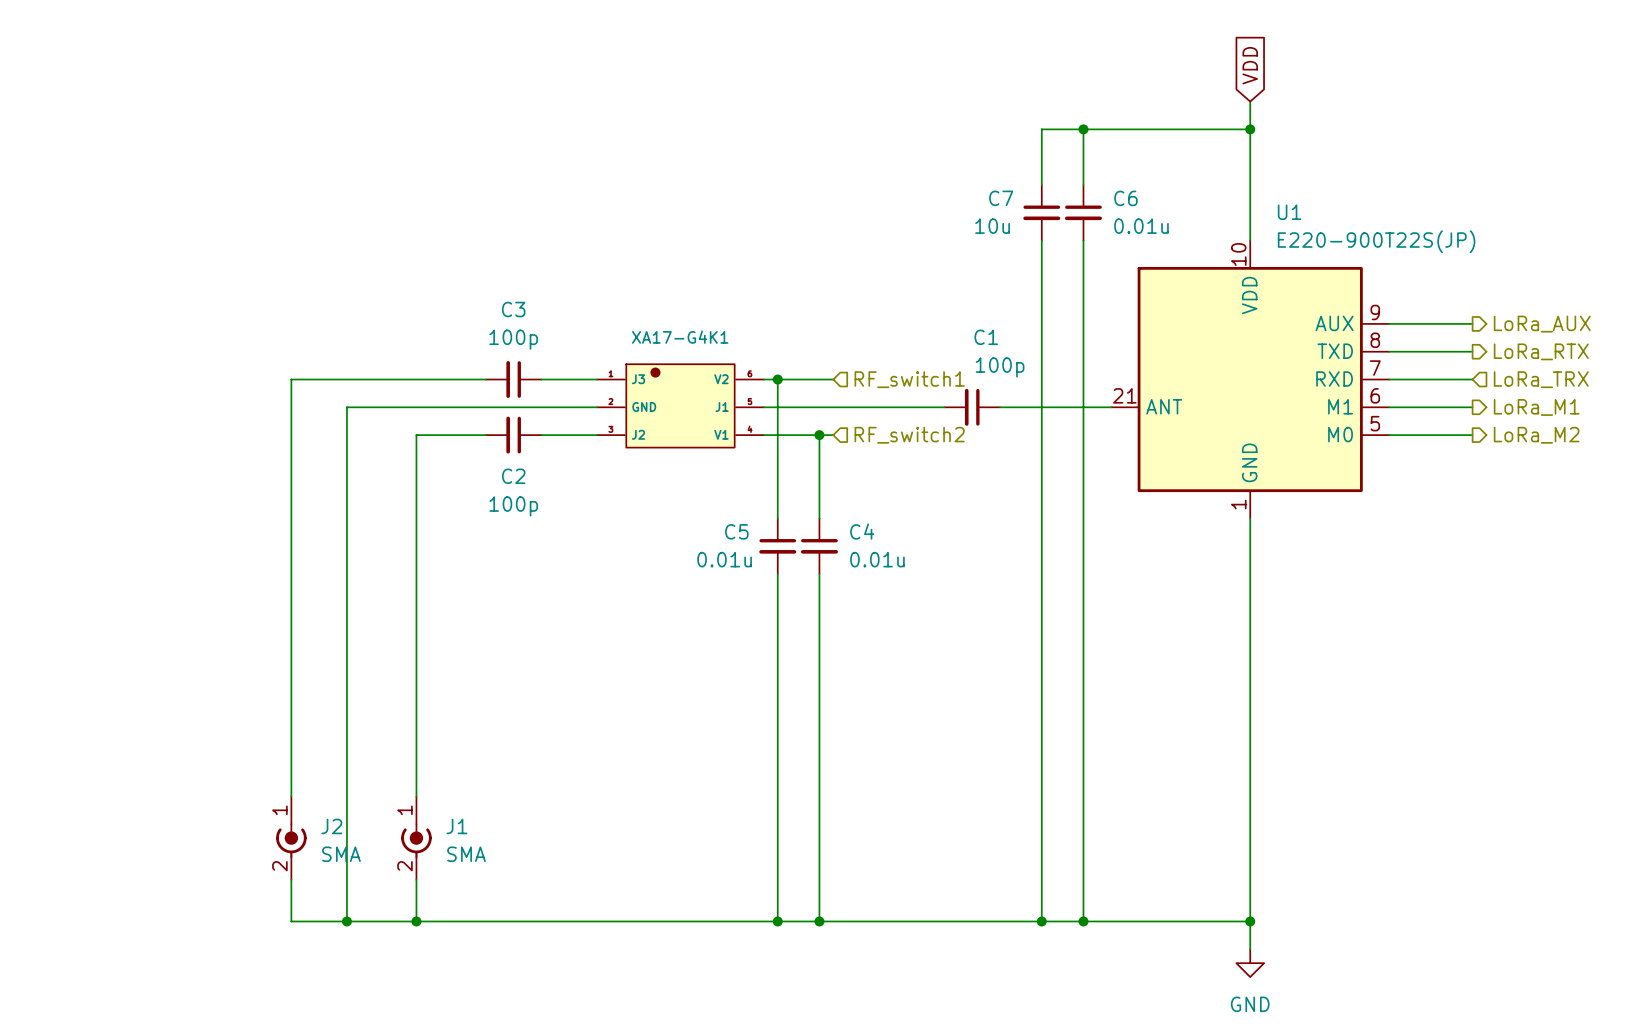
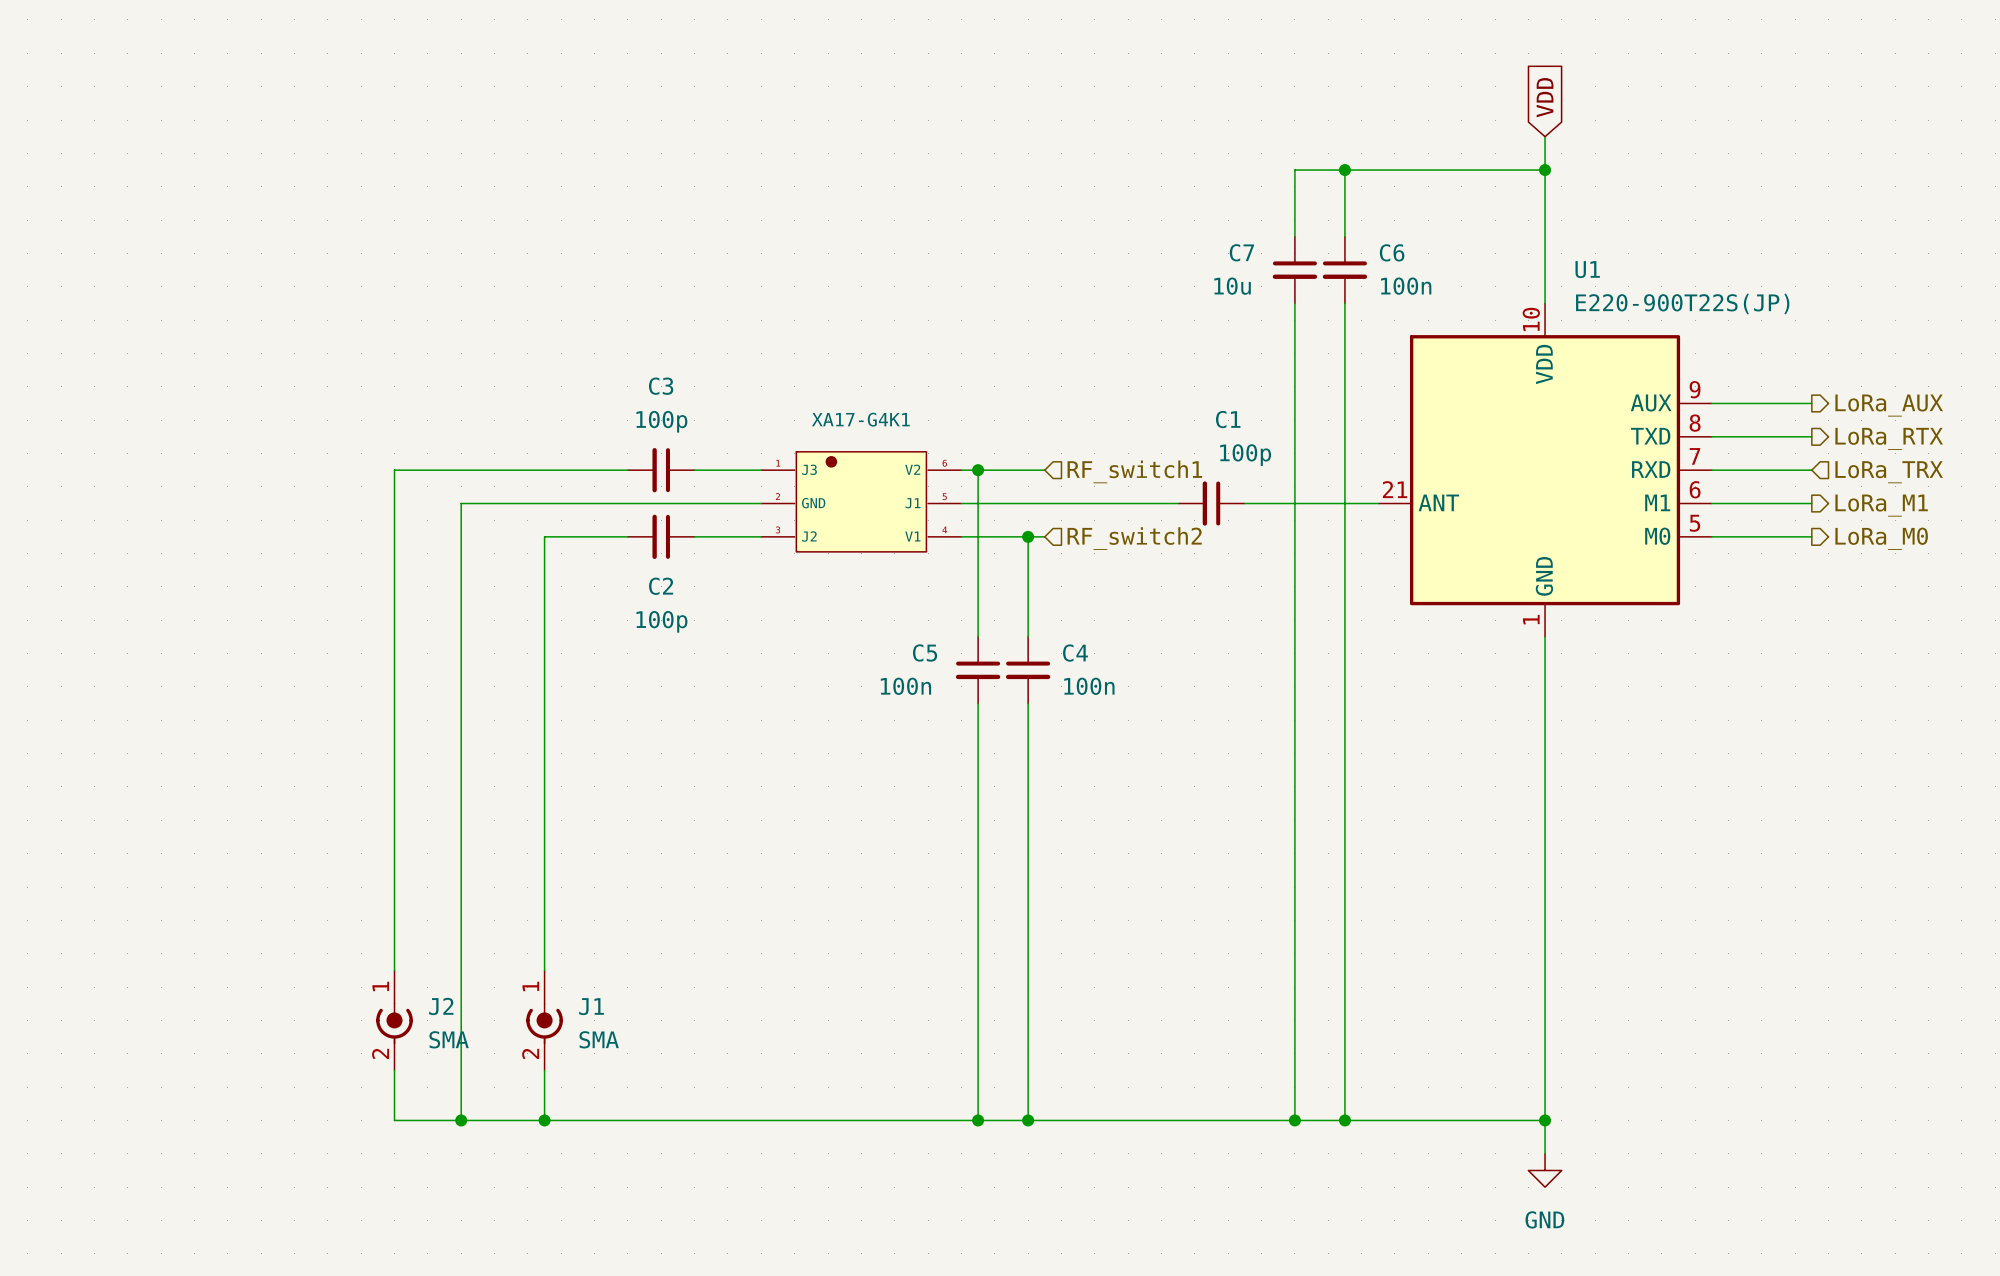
C6 value: 0.01u (1141, 226) -> 100n (1406, 286)
hierarchical label: LoRa_M2 (1536, 435) -> LoRa_M0 (1881, 538)
C5 value: 0.01u (724, 559) -> 100n (905, 686)
C4 value: 0.01u (877, 559) -> 100n (1089, 686)

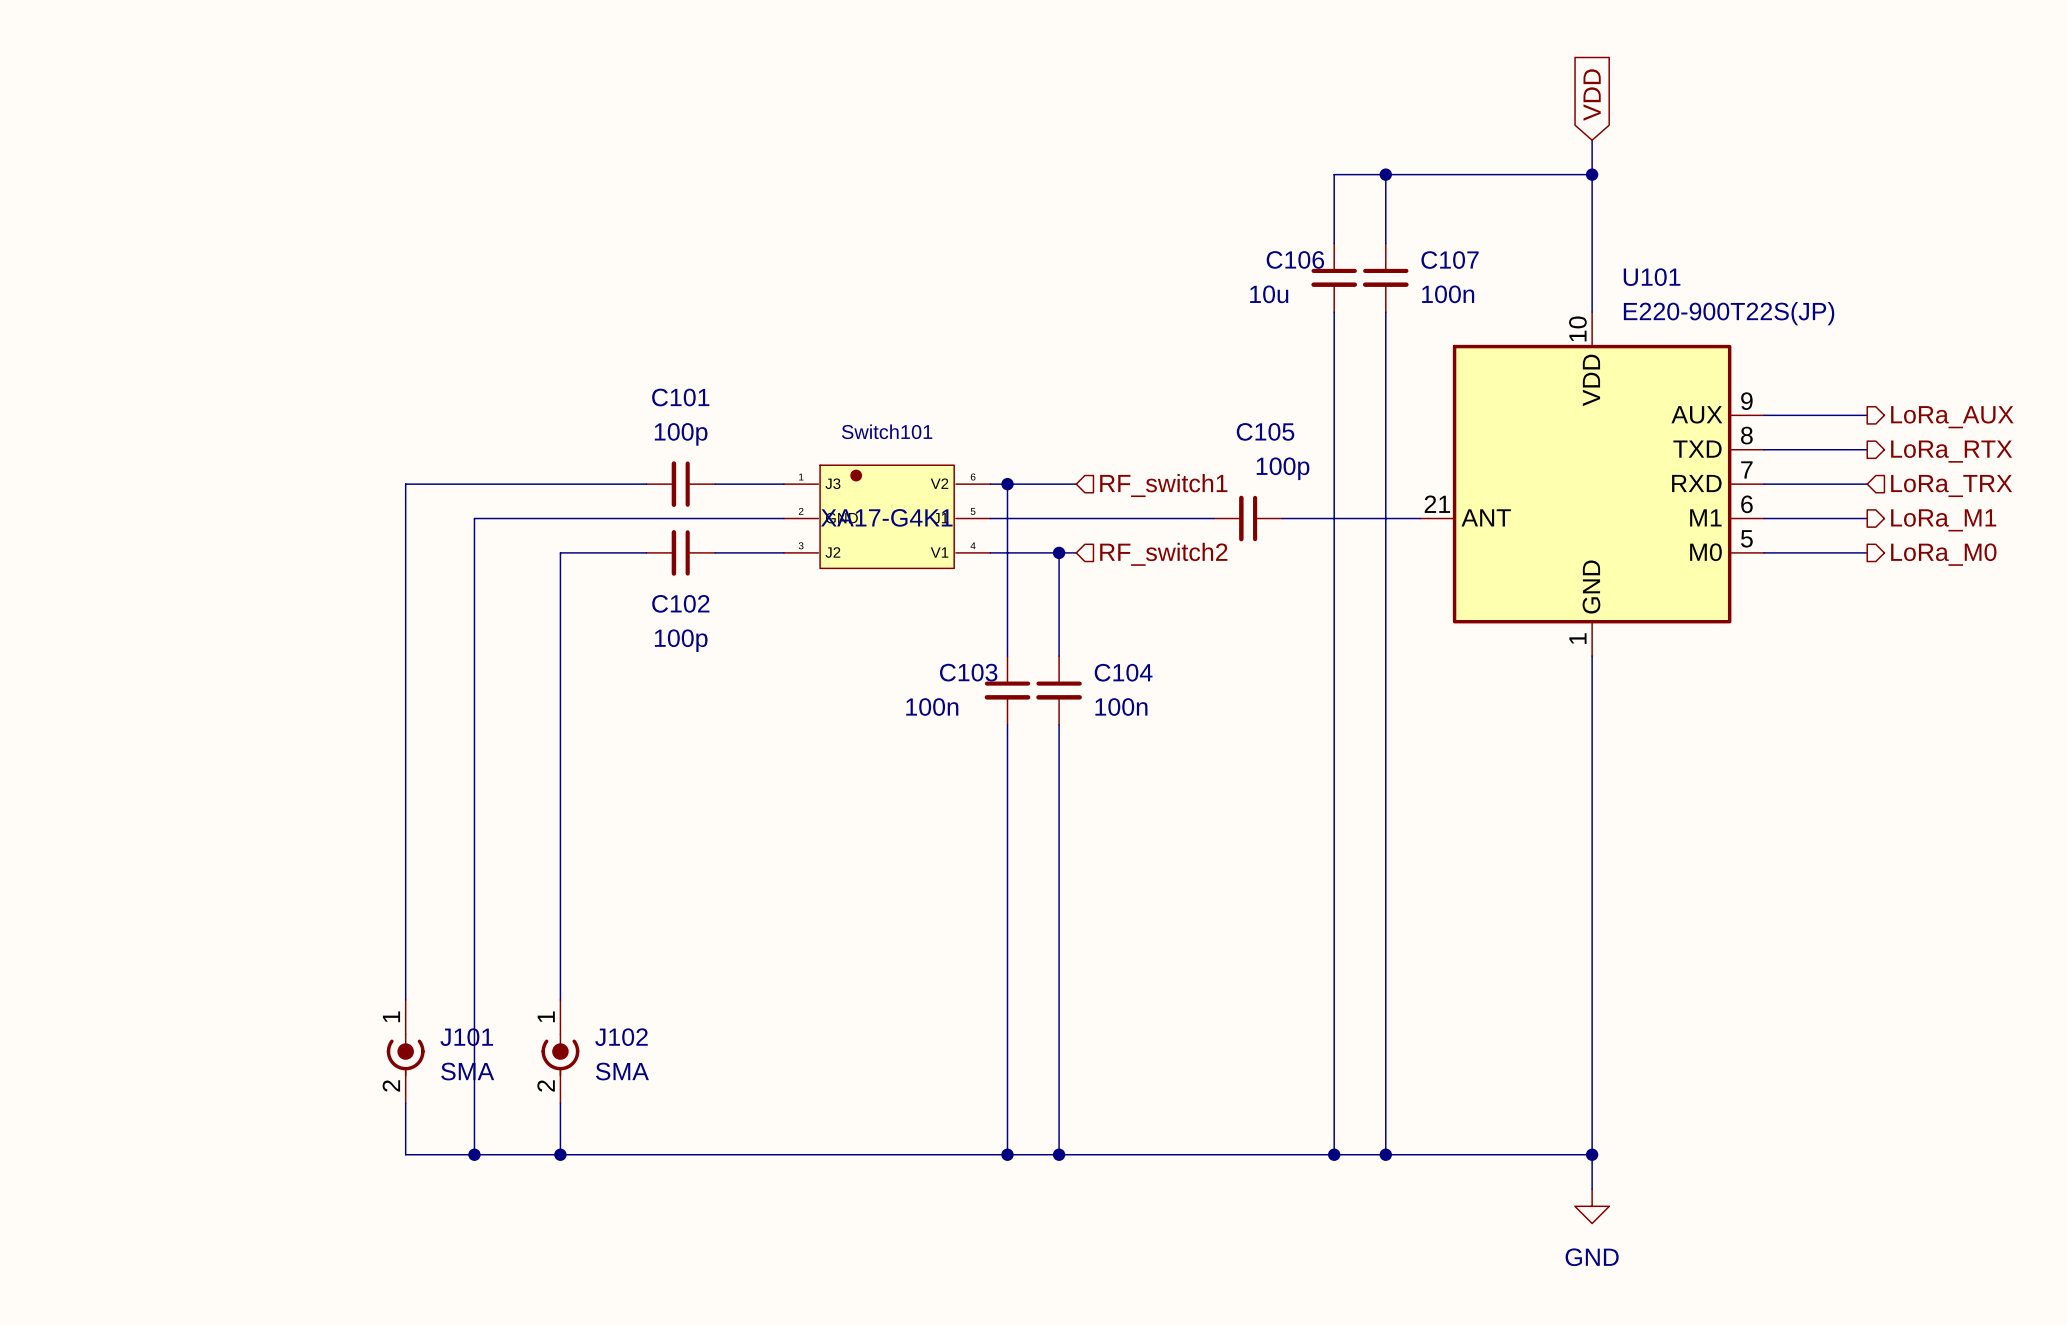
C7 name: C7 (1241, 252) -> C106 (1295, 259)
C6 name: C6 (1392, 252) -> C107 (1450, 260)
U1 name: U1 (1587, 269) -> U101 (1652, 277)
C3 name: C3 (661, 386) -> C101 (680, 397)
XA17-G4K1 name: XA17-G4K1 (860, 419) -> Switch101 (887, 431)
C1 name: C1 (1228, 419) -> C105 (1265, 431)
XA17-G4K1 value: none -> XA17-G4K1 (886, 517)
C2 name: C2 (661, 586) -> C102 (680, 603)
C5 name: C5 (925, 652) -> C103 (968, 672)
C4 name: C4 (1075, 653) -> C104 (1123, 672)
J2 name: J2 (441, 1006) -> J101 (466, 1037)
J1 name: J1 (591, 1006) -> J102 (621, 1037)

